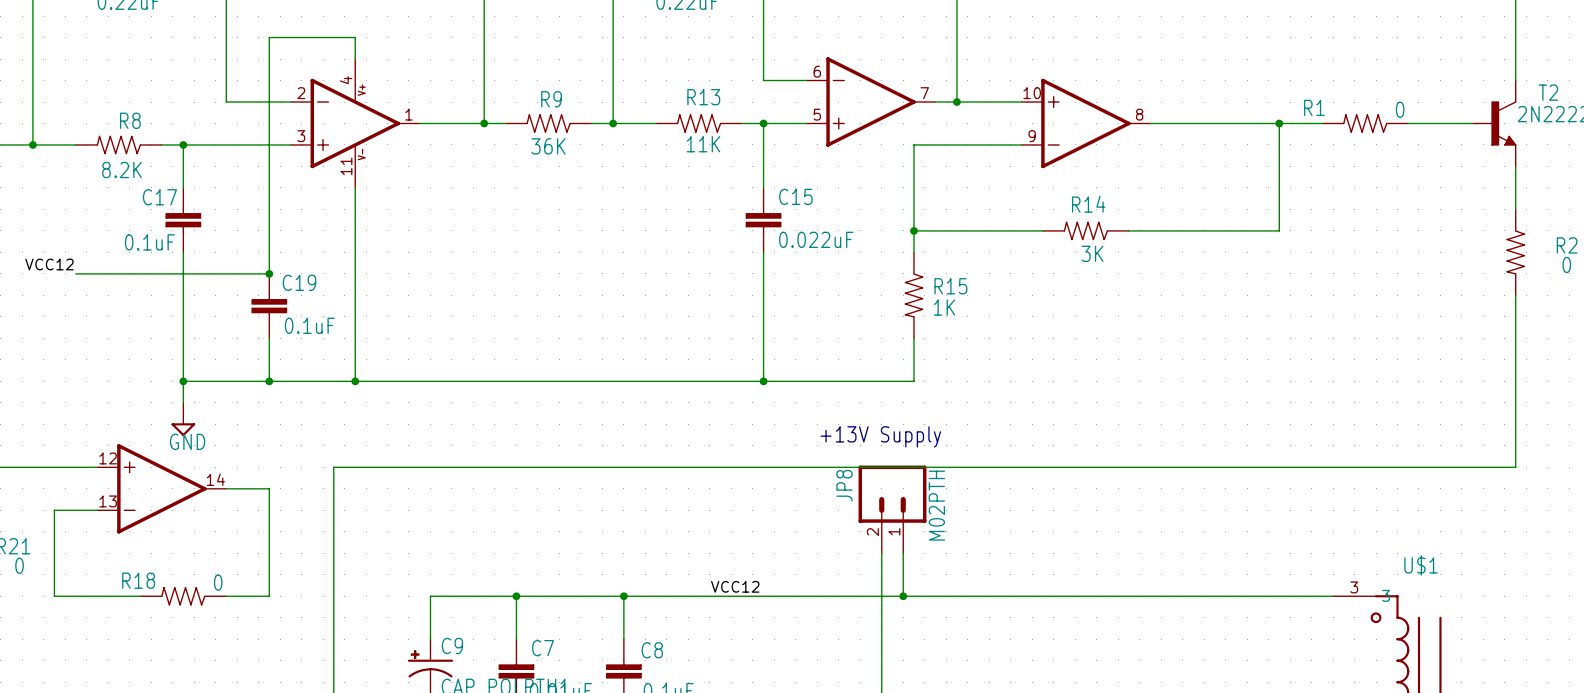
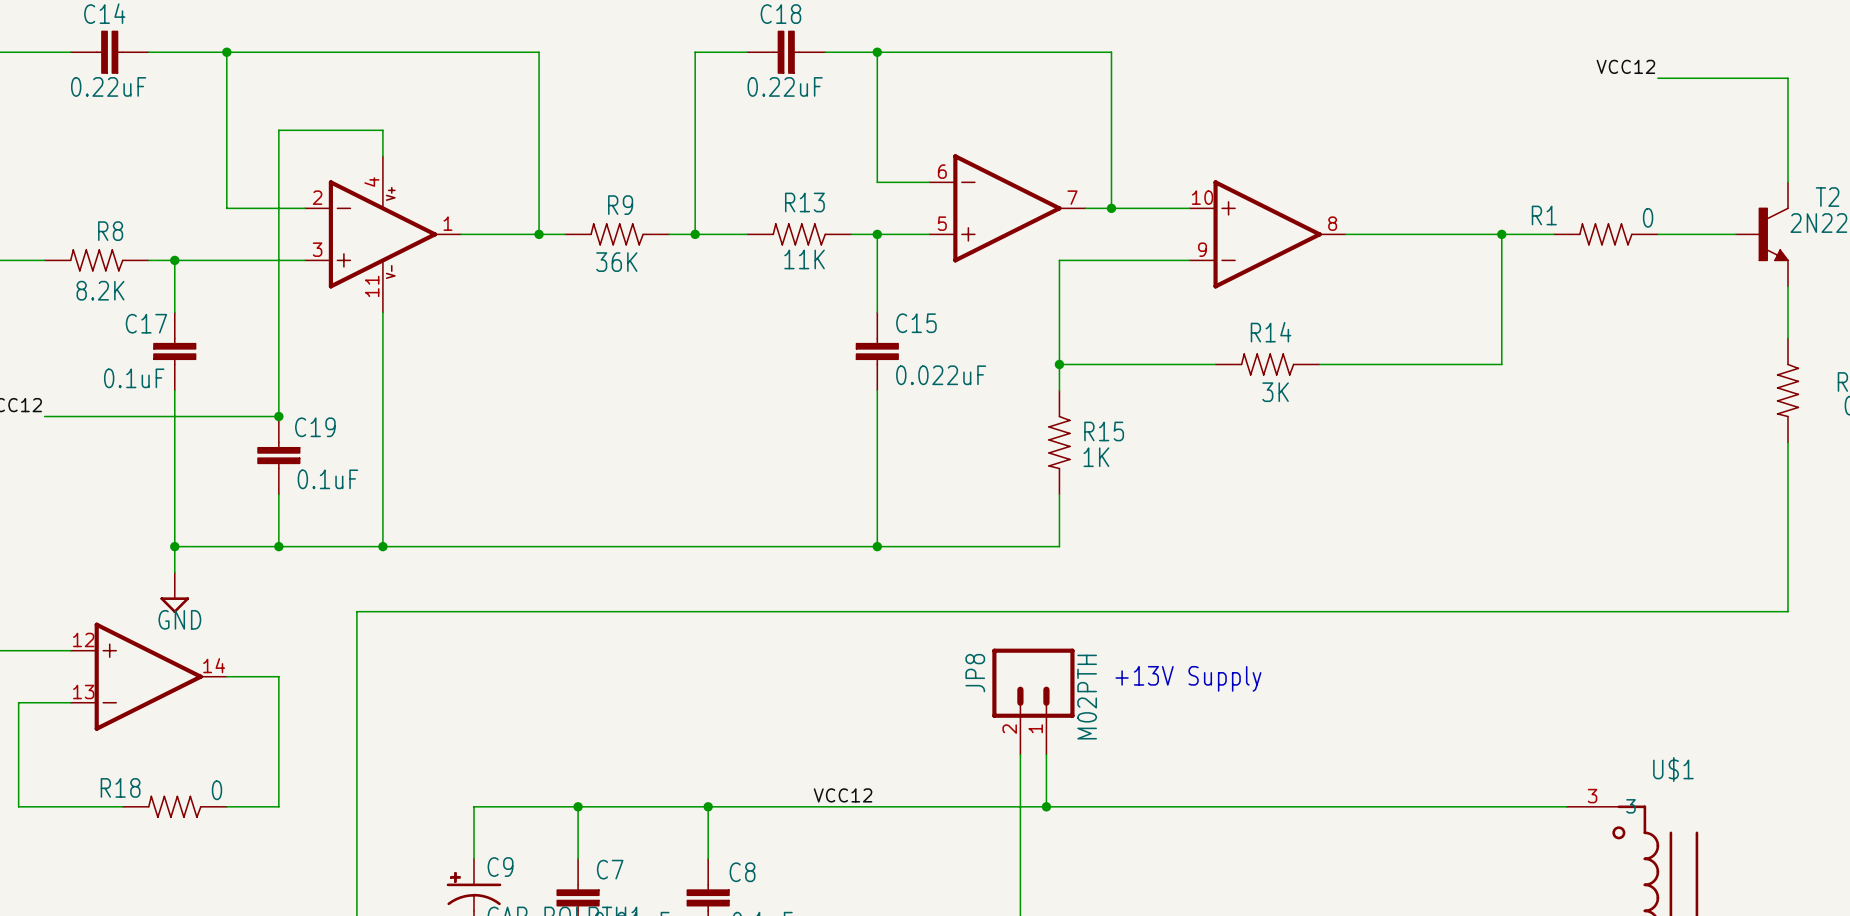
wire: (1515, 435) (1515, 467) (333, 467) -> (1787, 611) (356, 611) (356, 650)
text position: +13V Supply (880, 436) -> +13V Supply (1188, 678)

